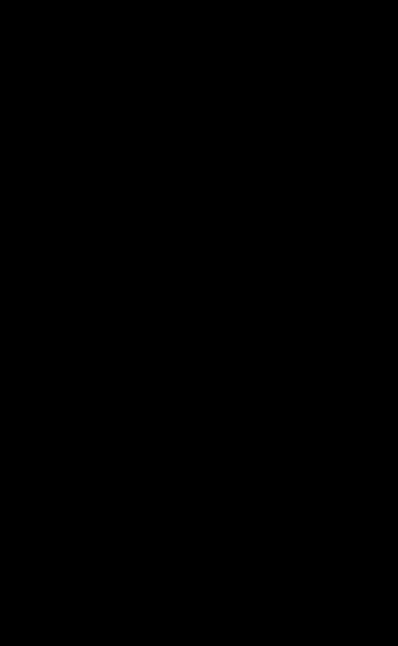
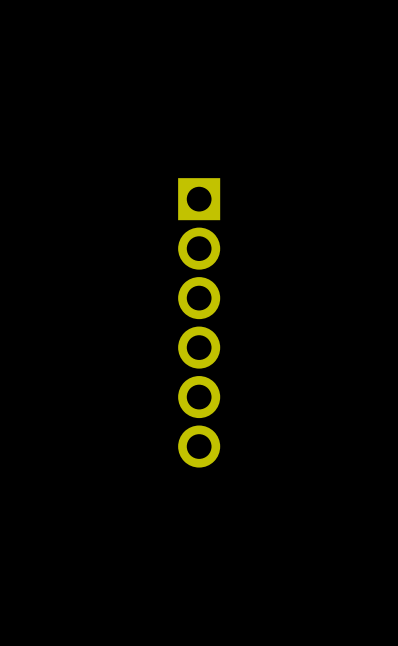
part: none -> (199, 322)

